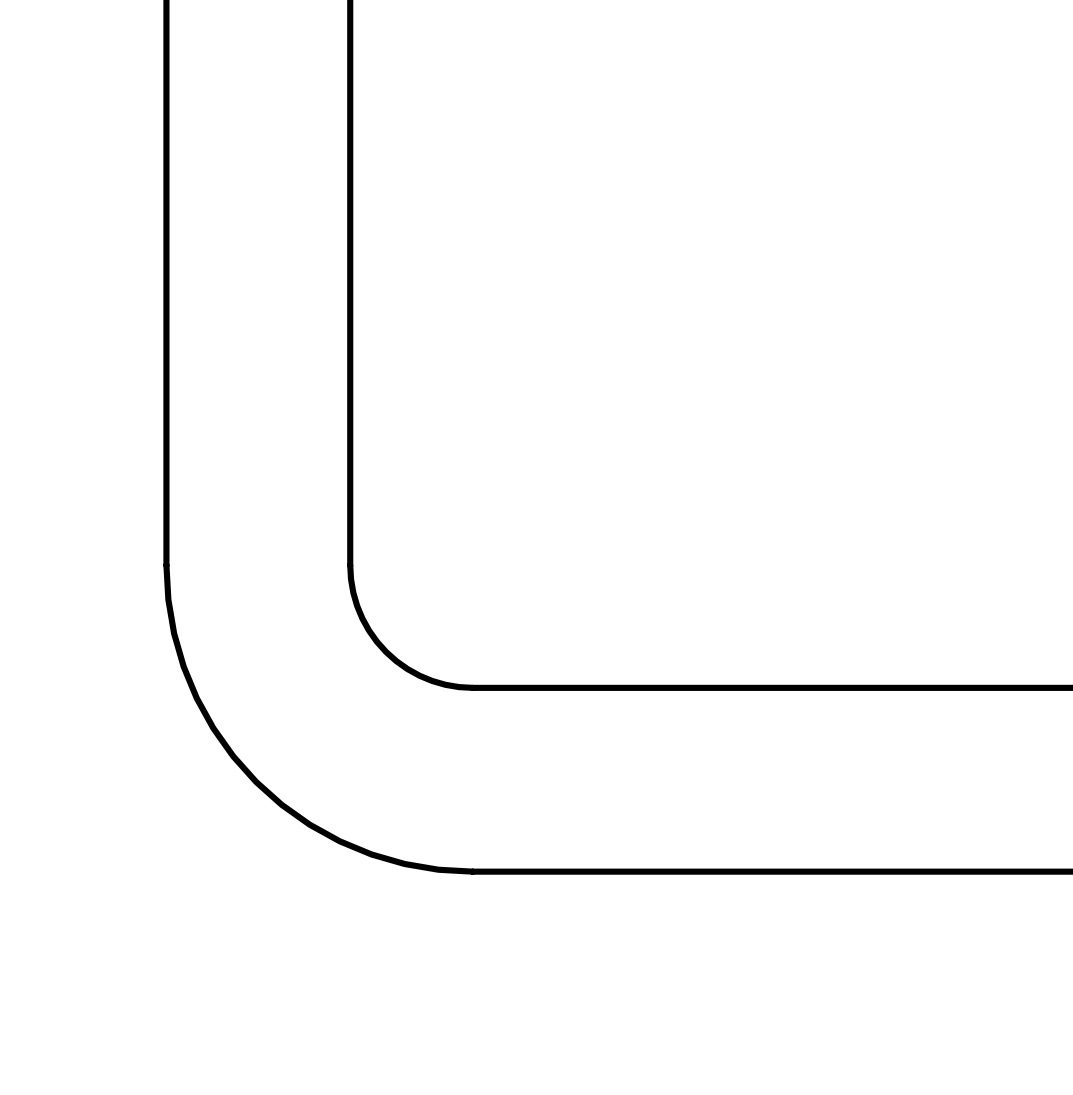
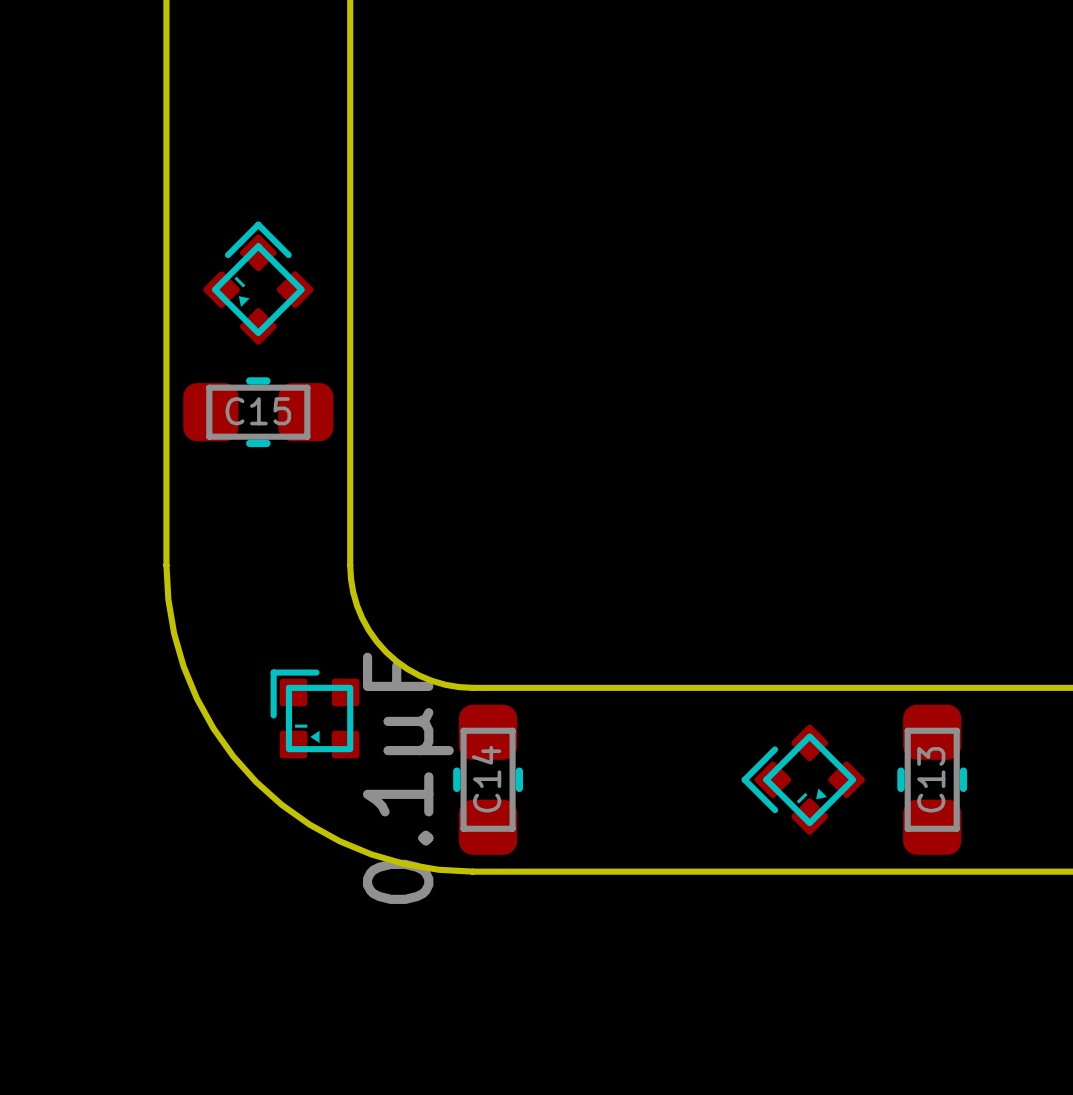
part: none -> (258, 283)
C15: none -> (258, 412)
part: none -> (315, 713)
C14: none -> 0.1µF (488, 779)
part: none -> (803, 779)
C13: none -> (932, 779)

